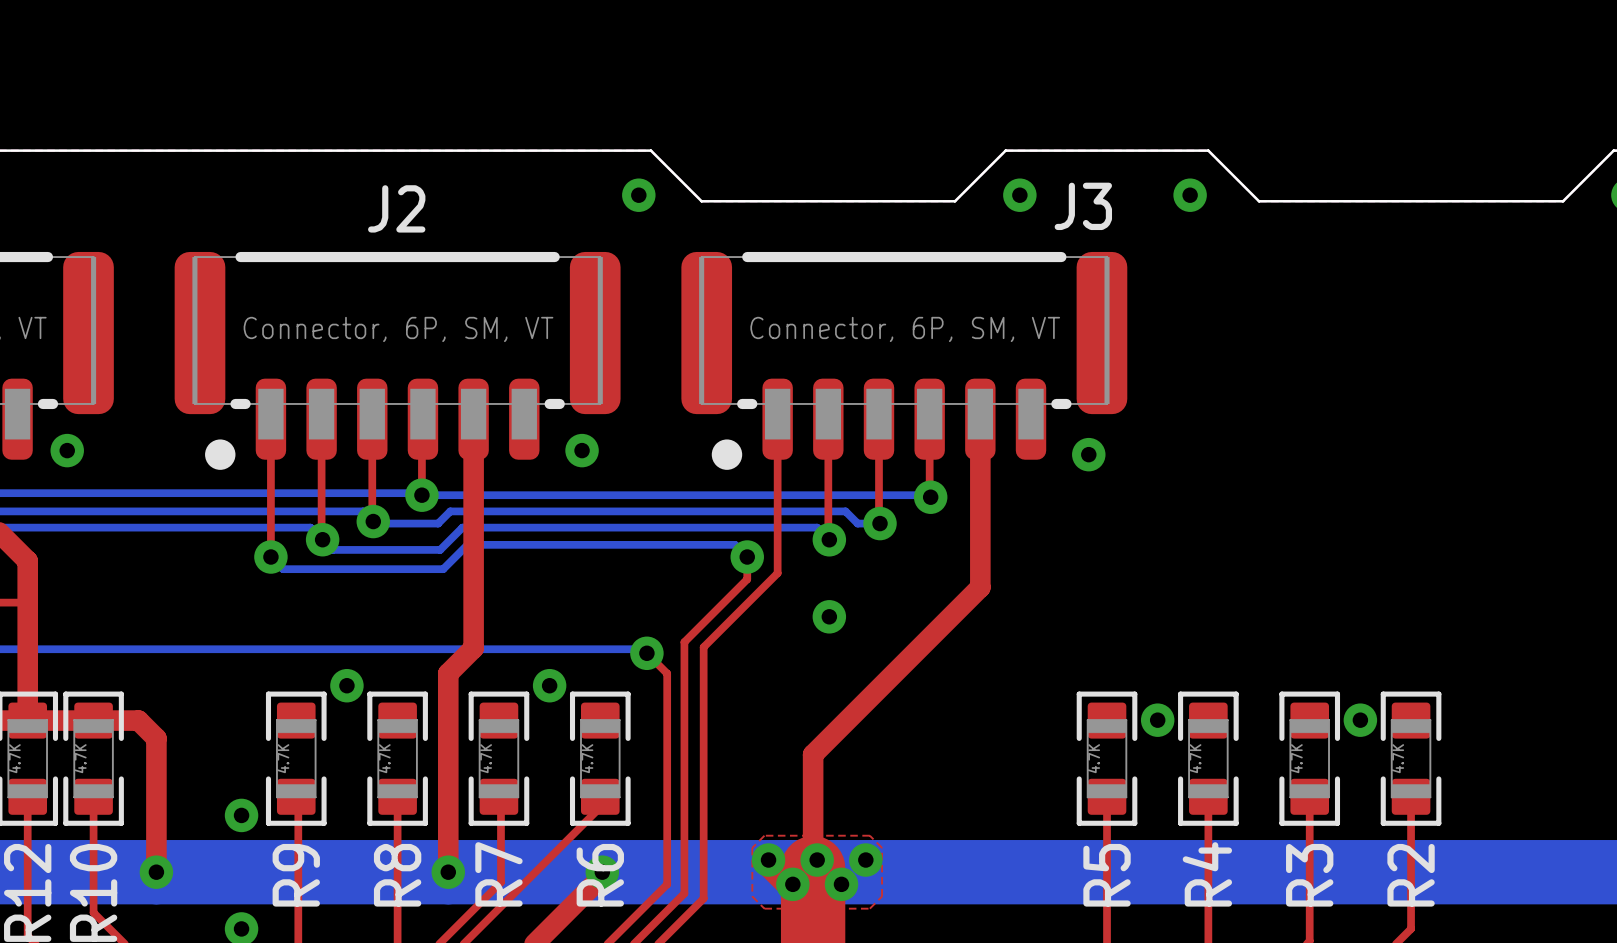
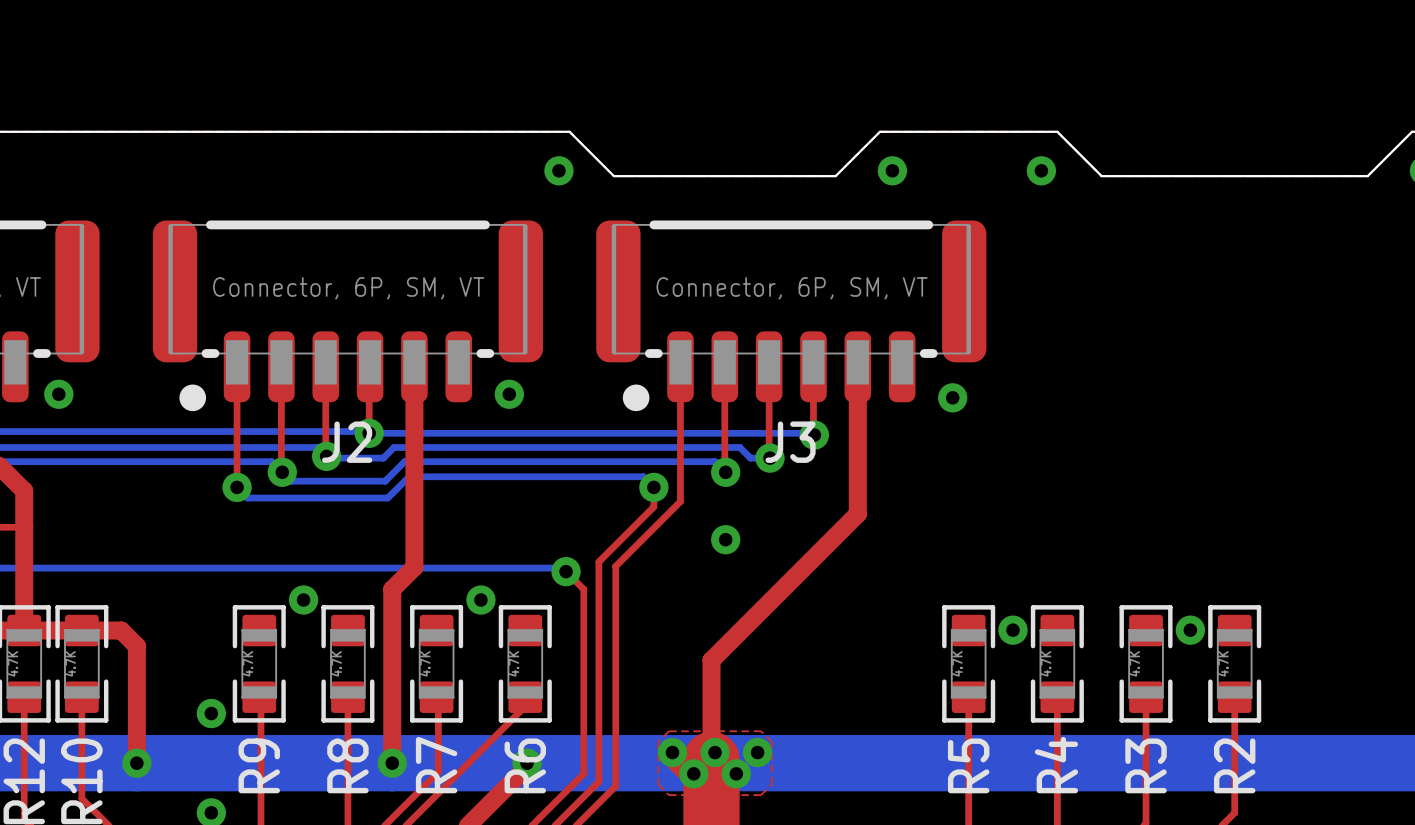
J3 name position: J3 (1083, 206) -> J3 (790, 442)
J2 name position: J2 (396, 208) -> J2 (347, 442)

